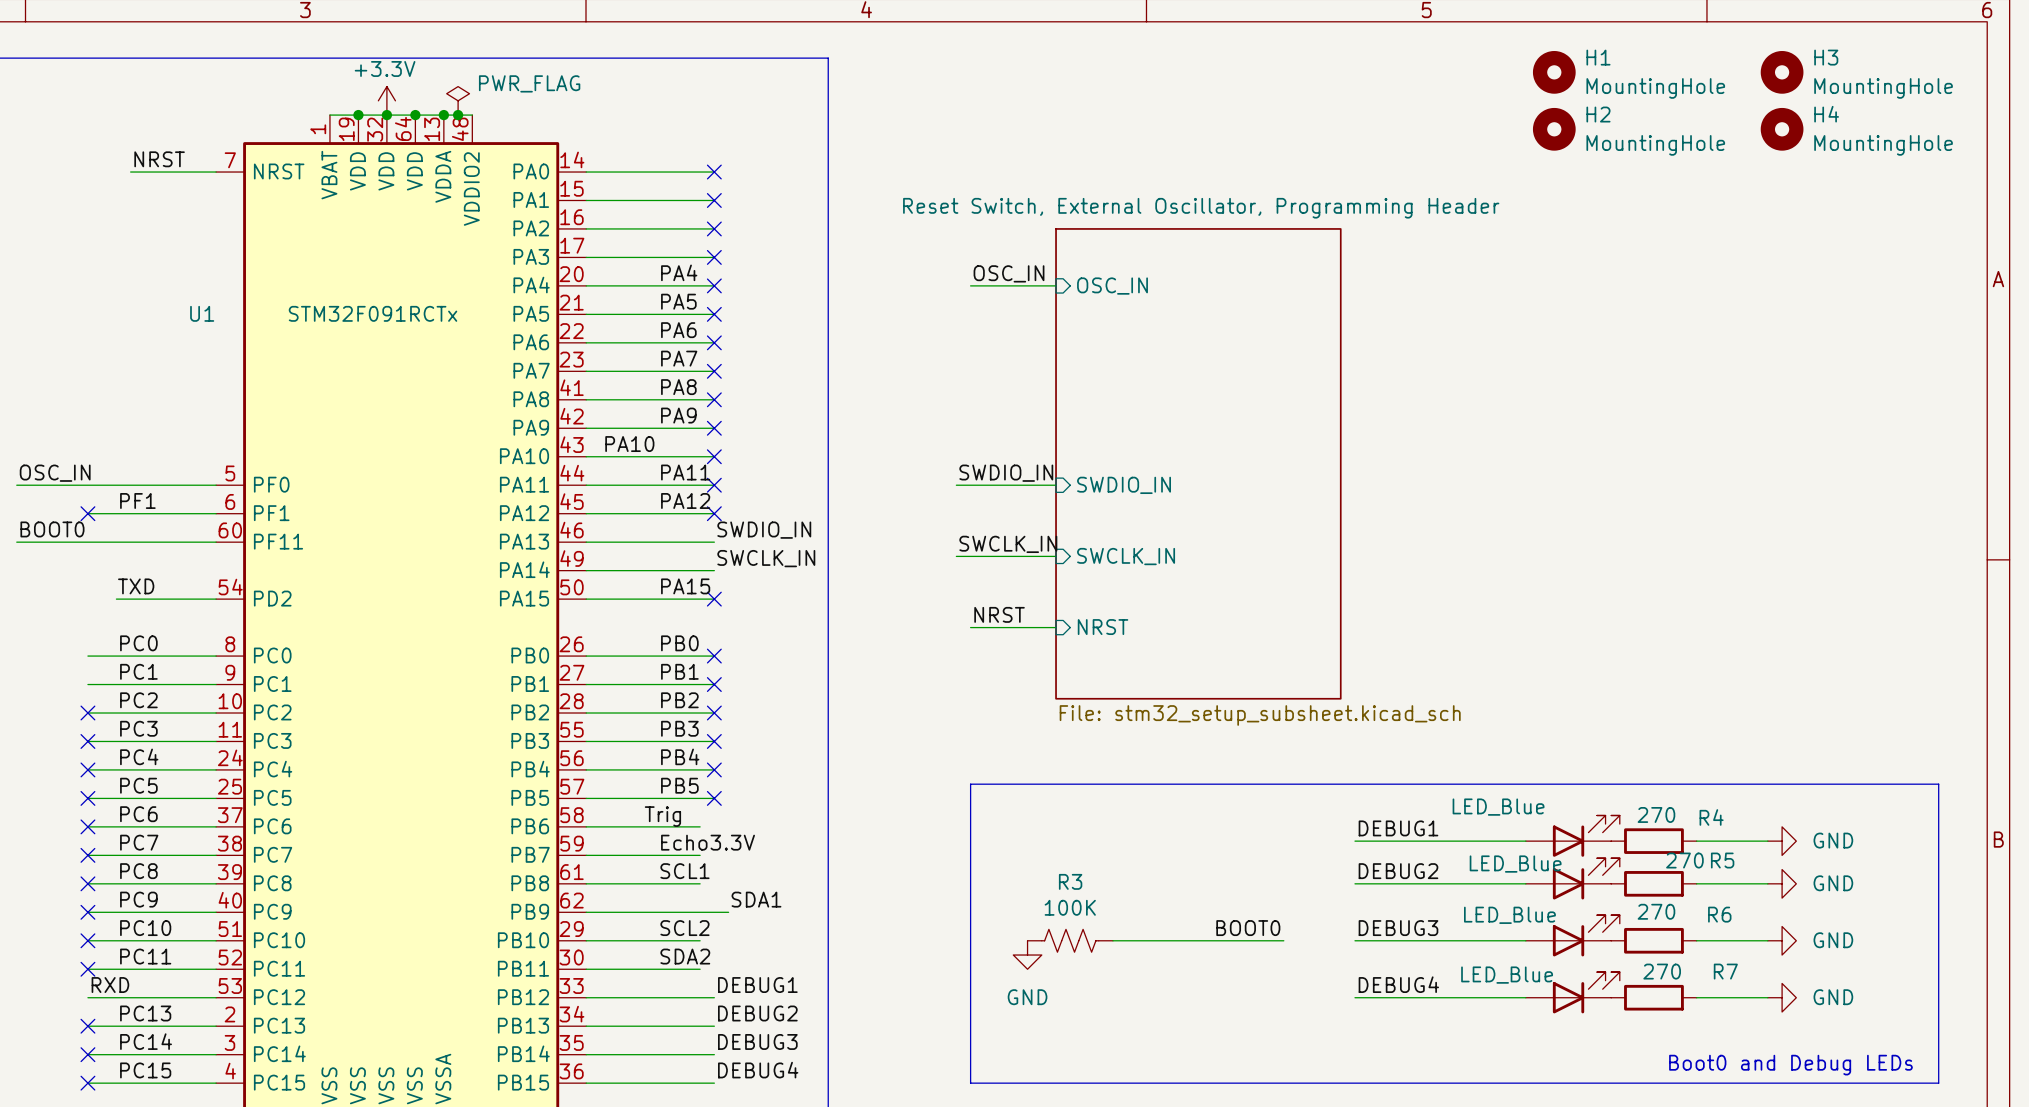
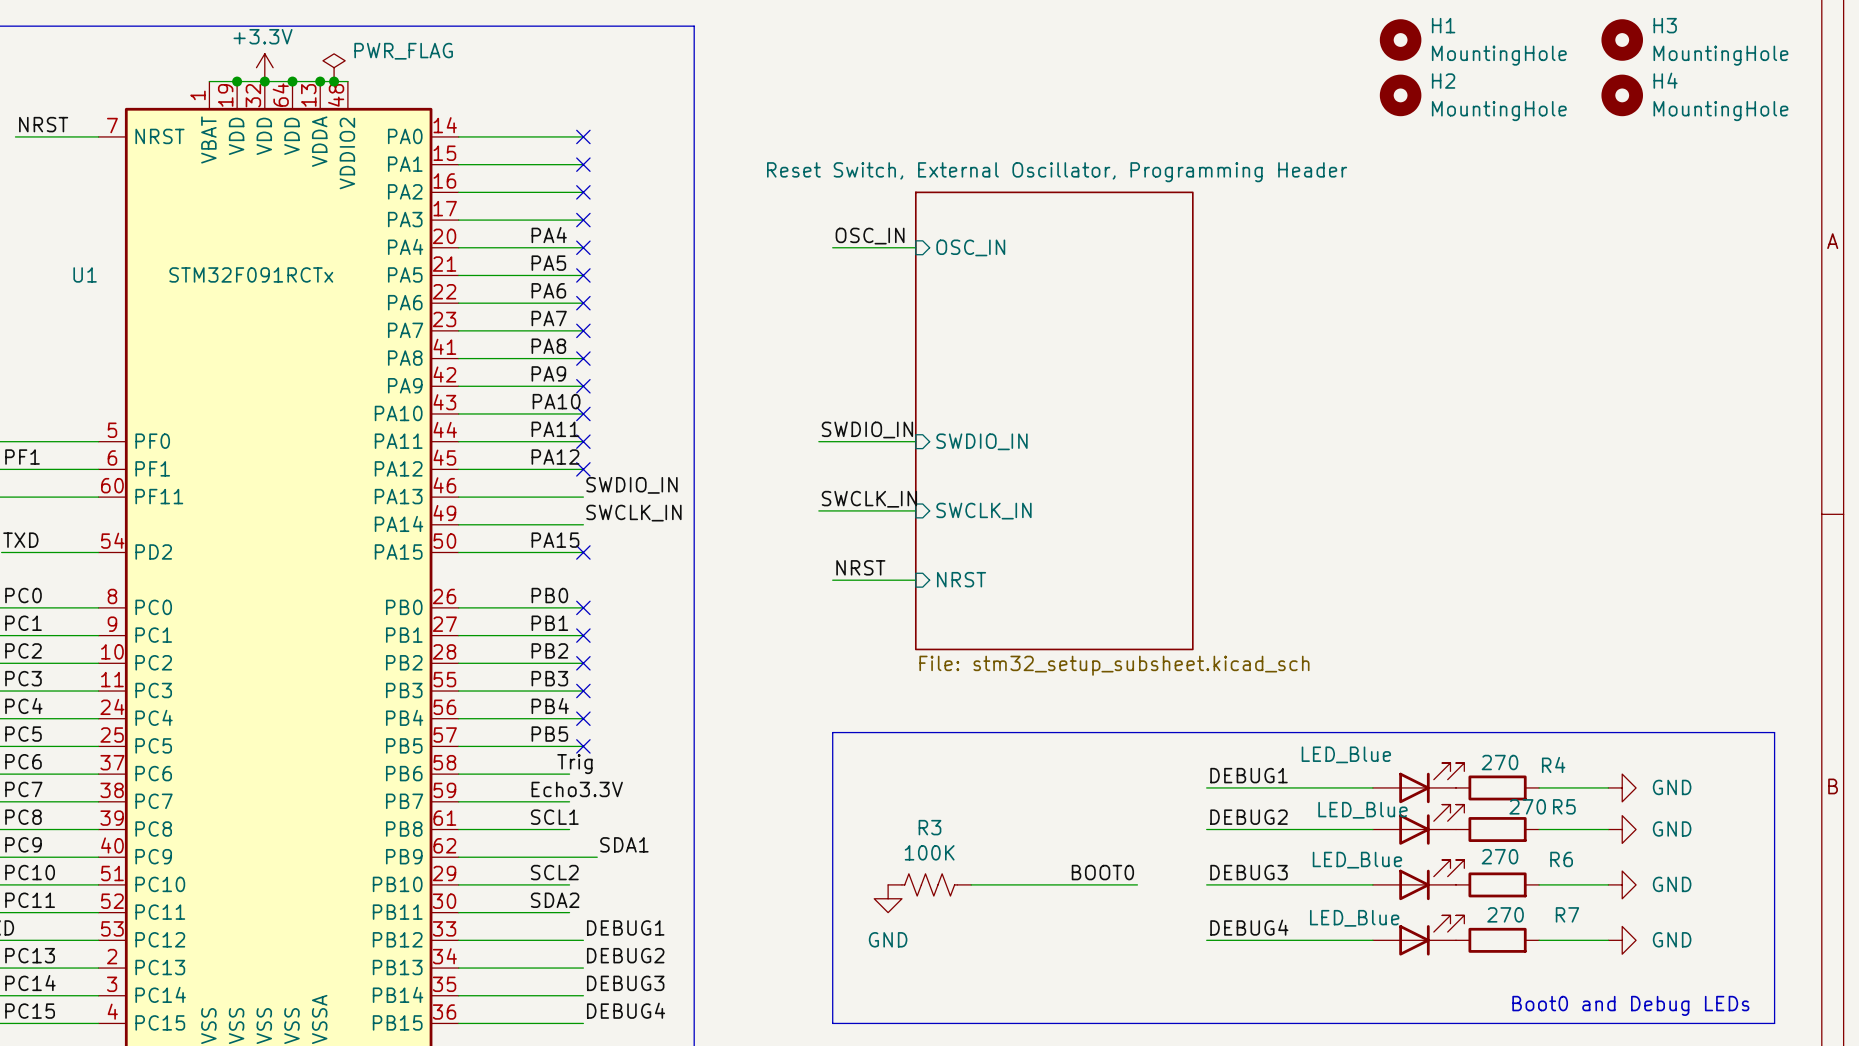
label position: PA10 (629, 444) -> PA10 (556, 401)
label position: Trig (662, 816) -> Trig (574, 764)

